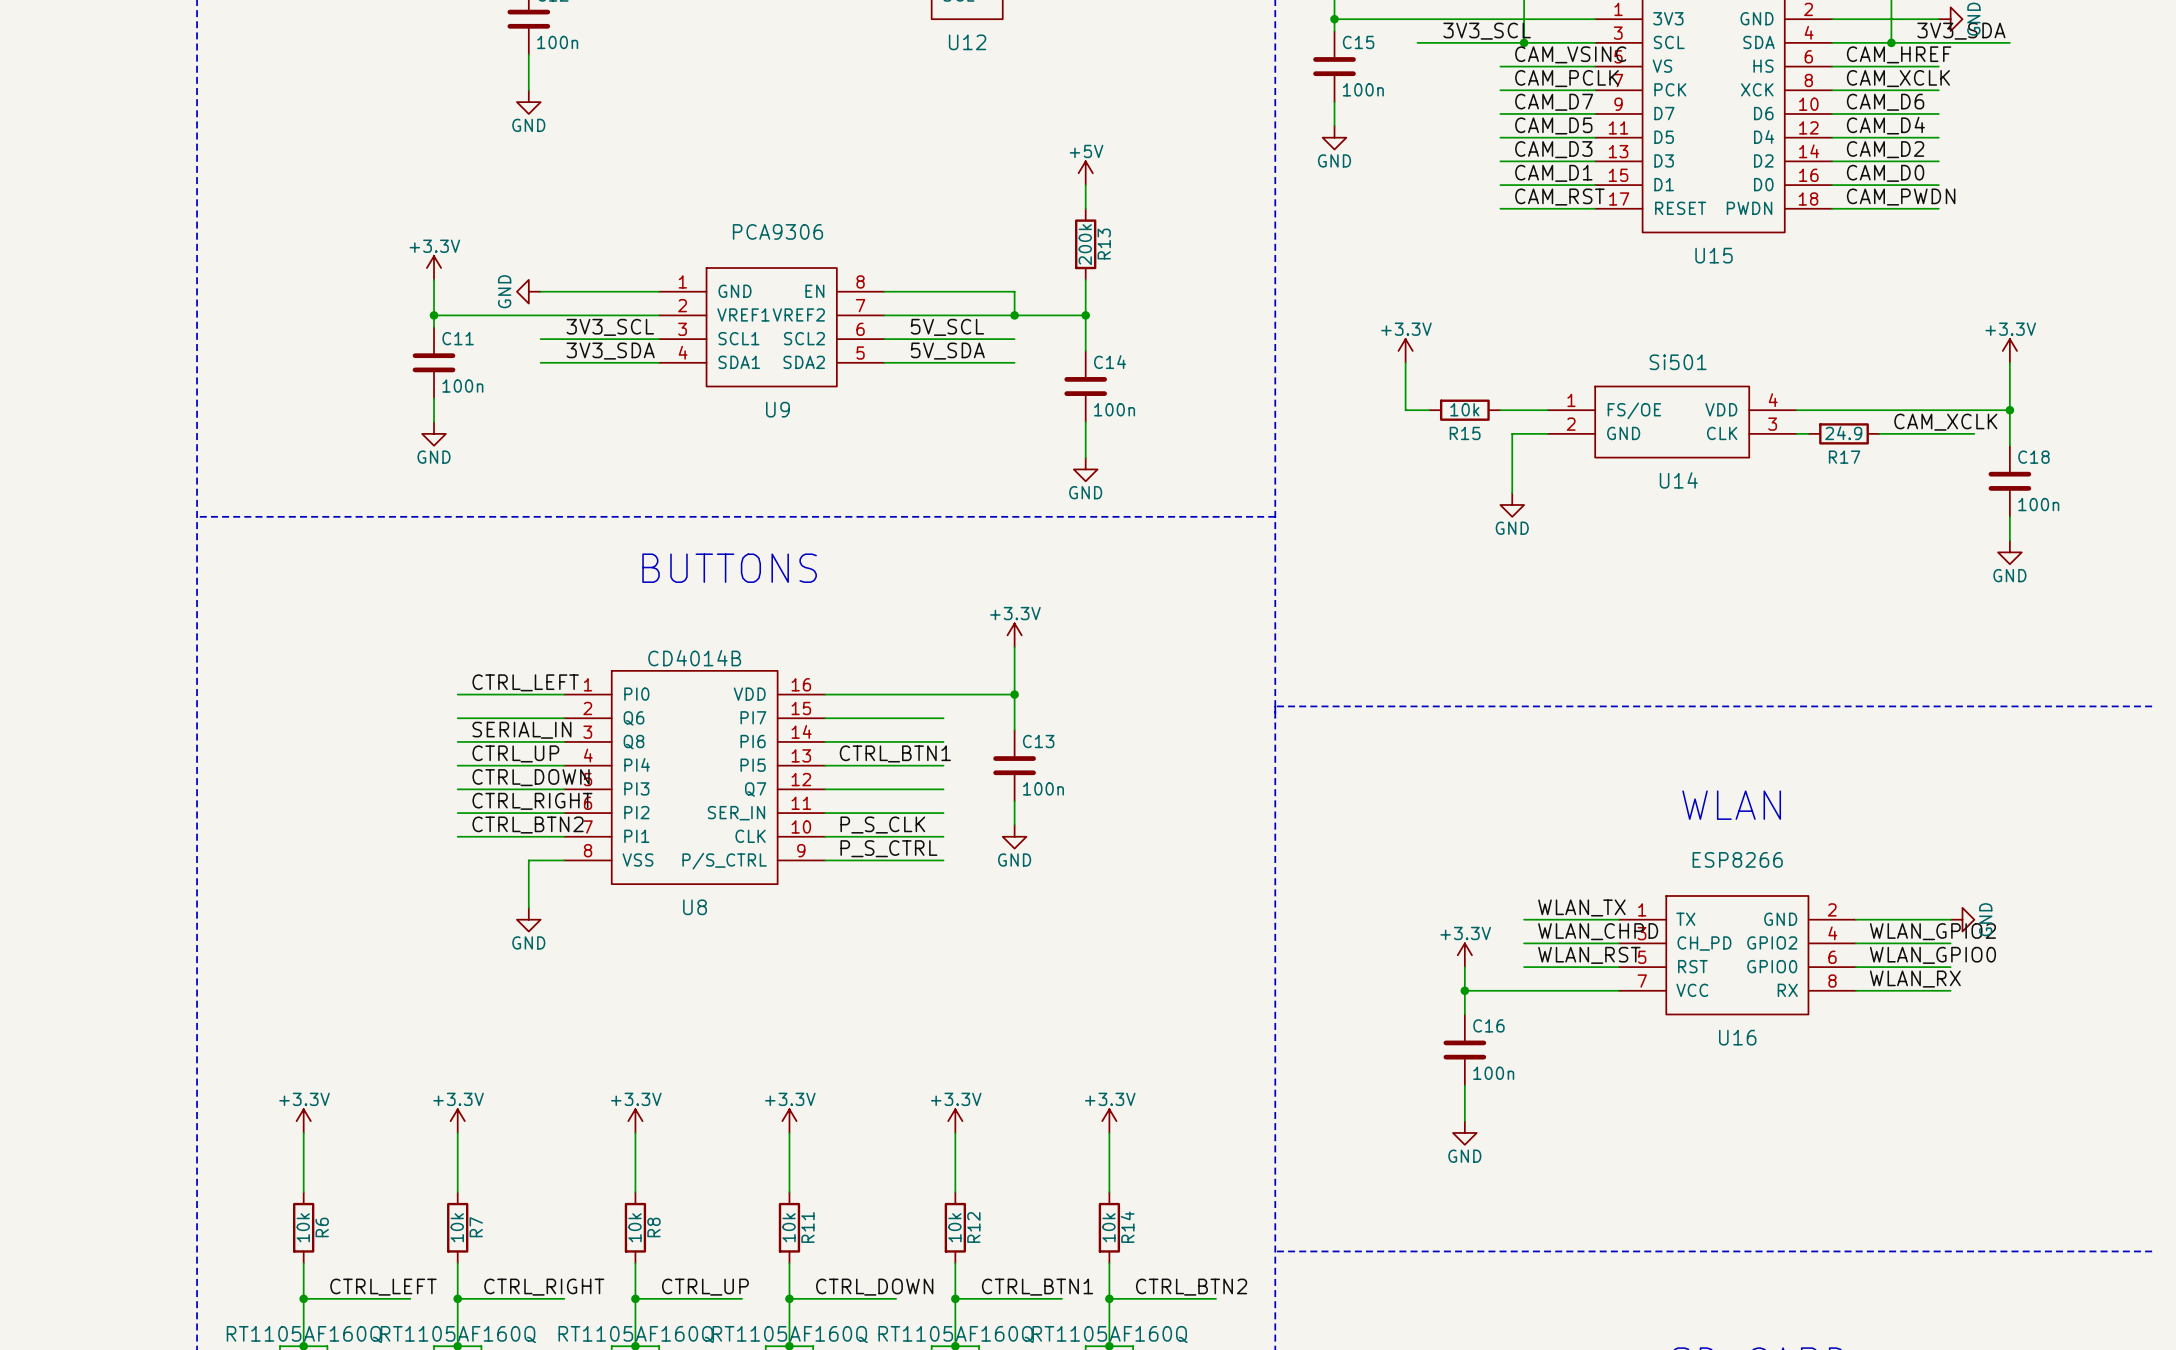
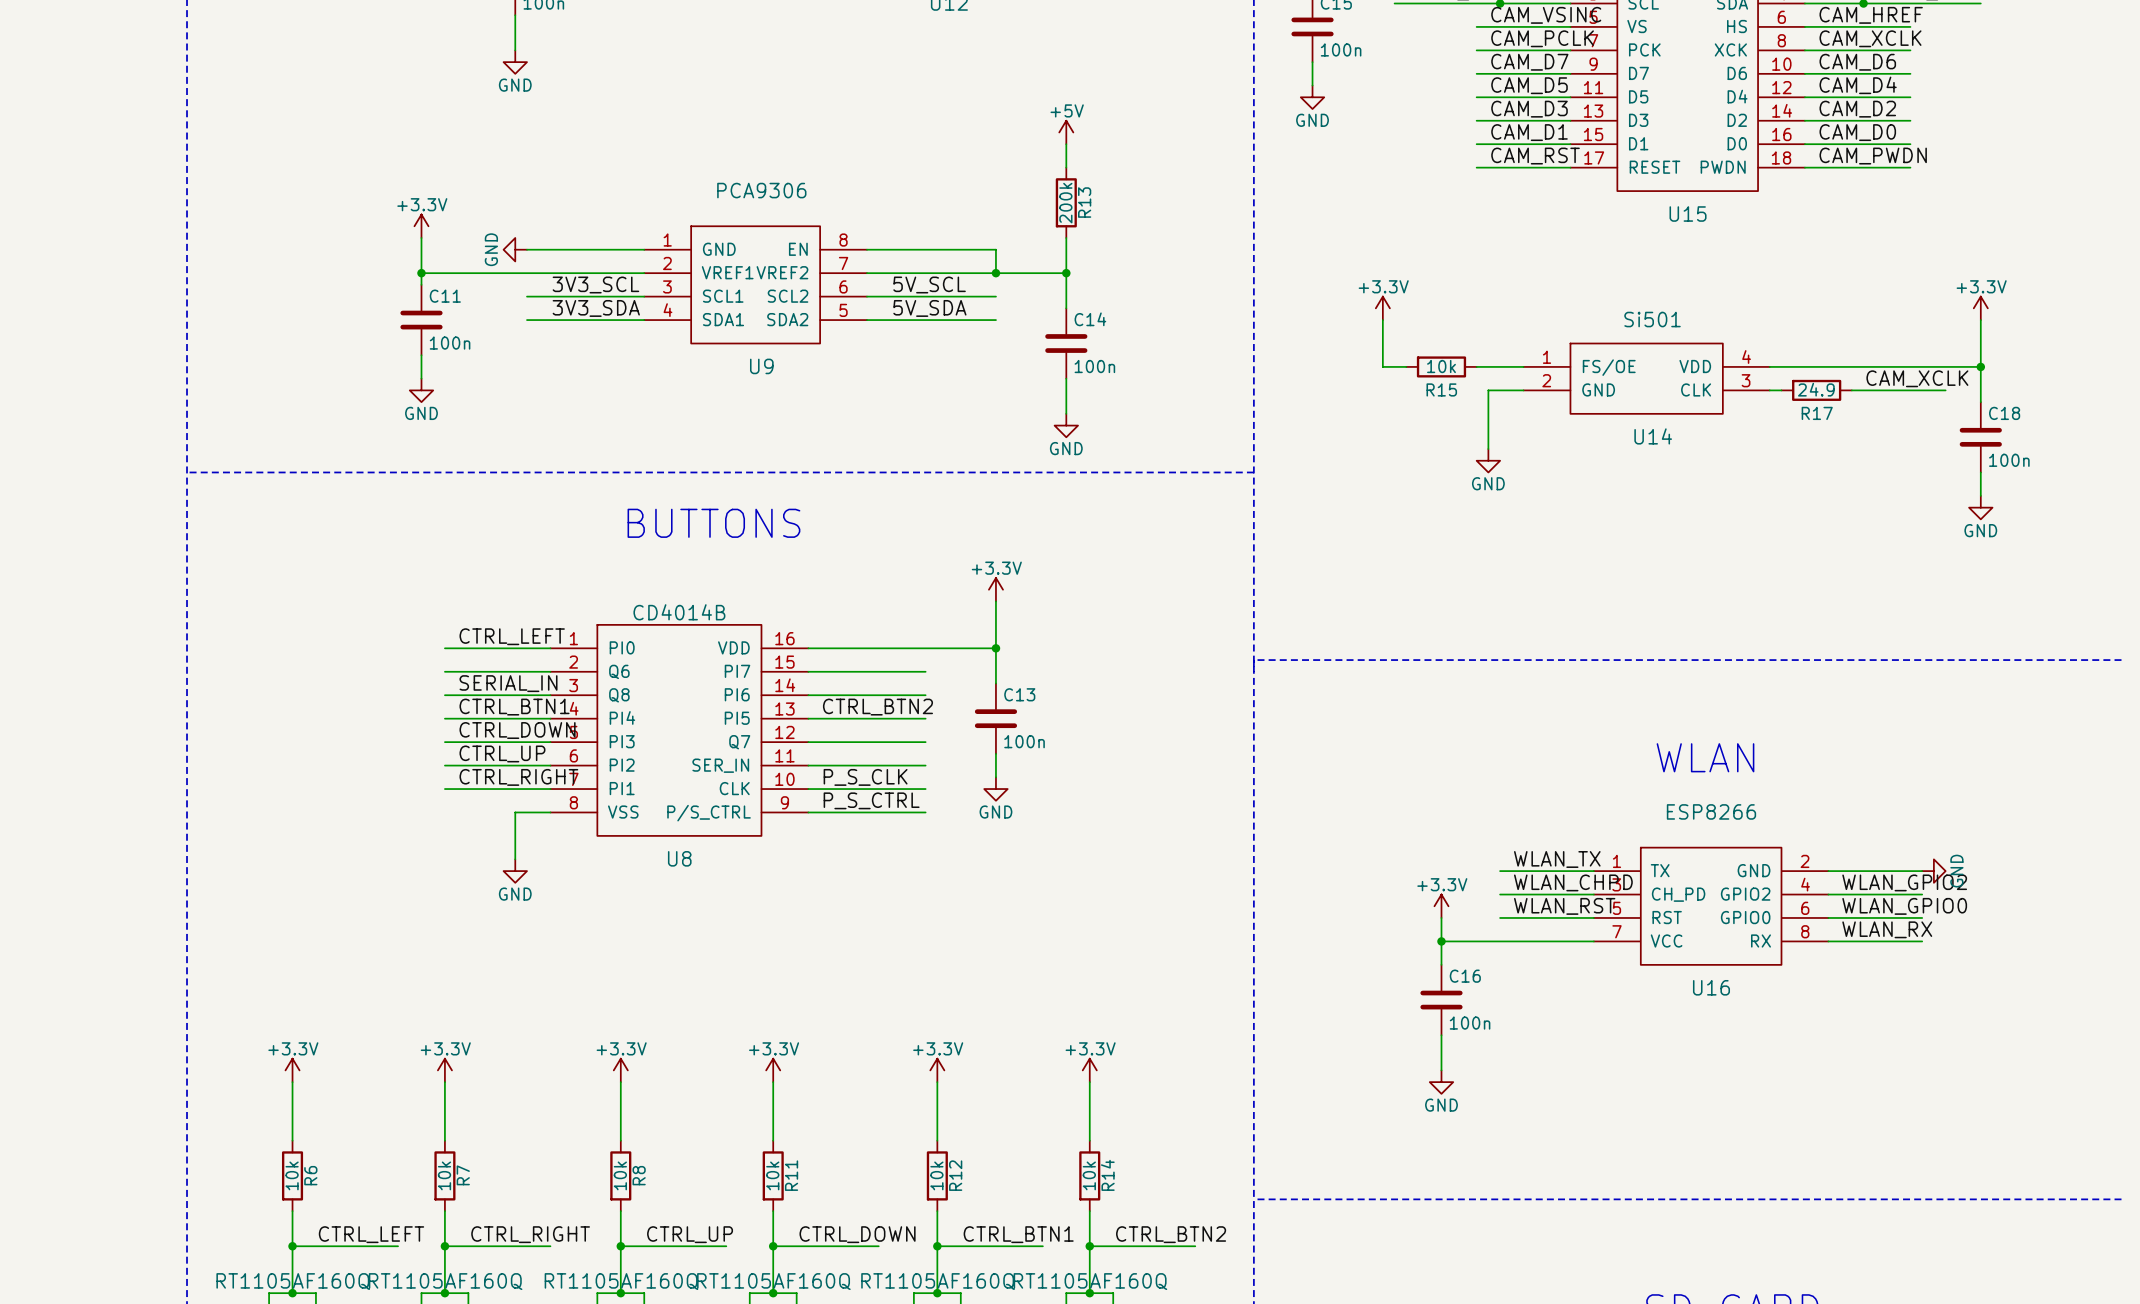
label: CTRL_UP (515, 753) -> CTRL_BTN1 (514, 707)
label: CTRL_BTN1 (895, 753) -> CTRL_BTN2 (877, 707)
label: CTRL_RIGHT (532, 801) -> CTRL_UP (502, 753)
label: CTRL_BTN2 (528, 825) -> CTRL_RIGHT (518, 777)

